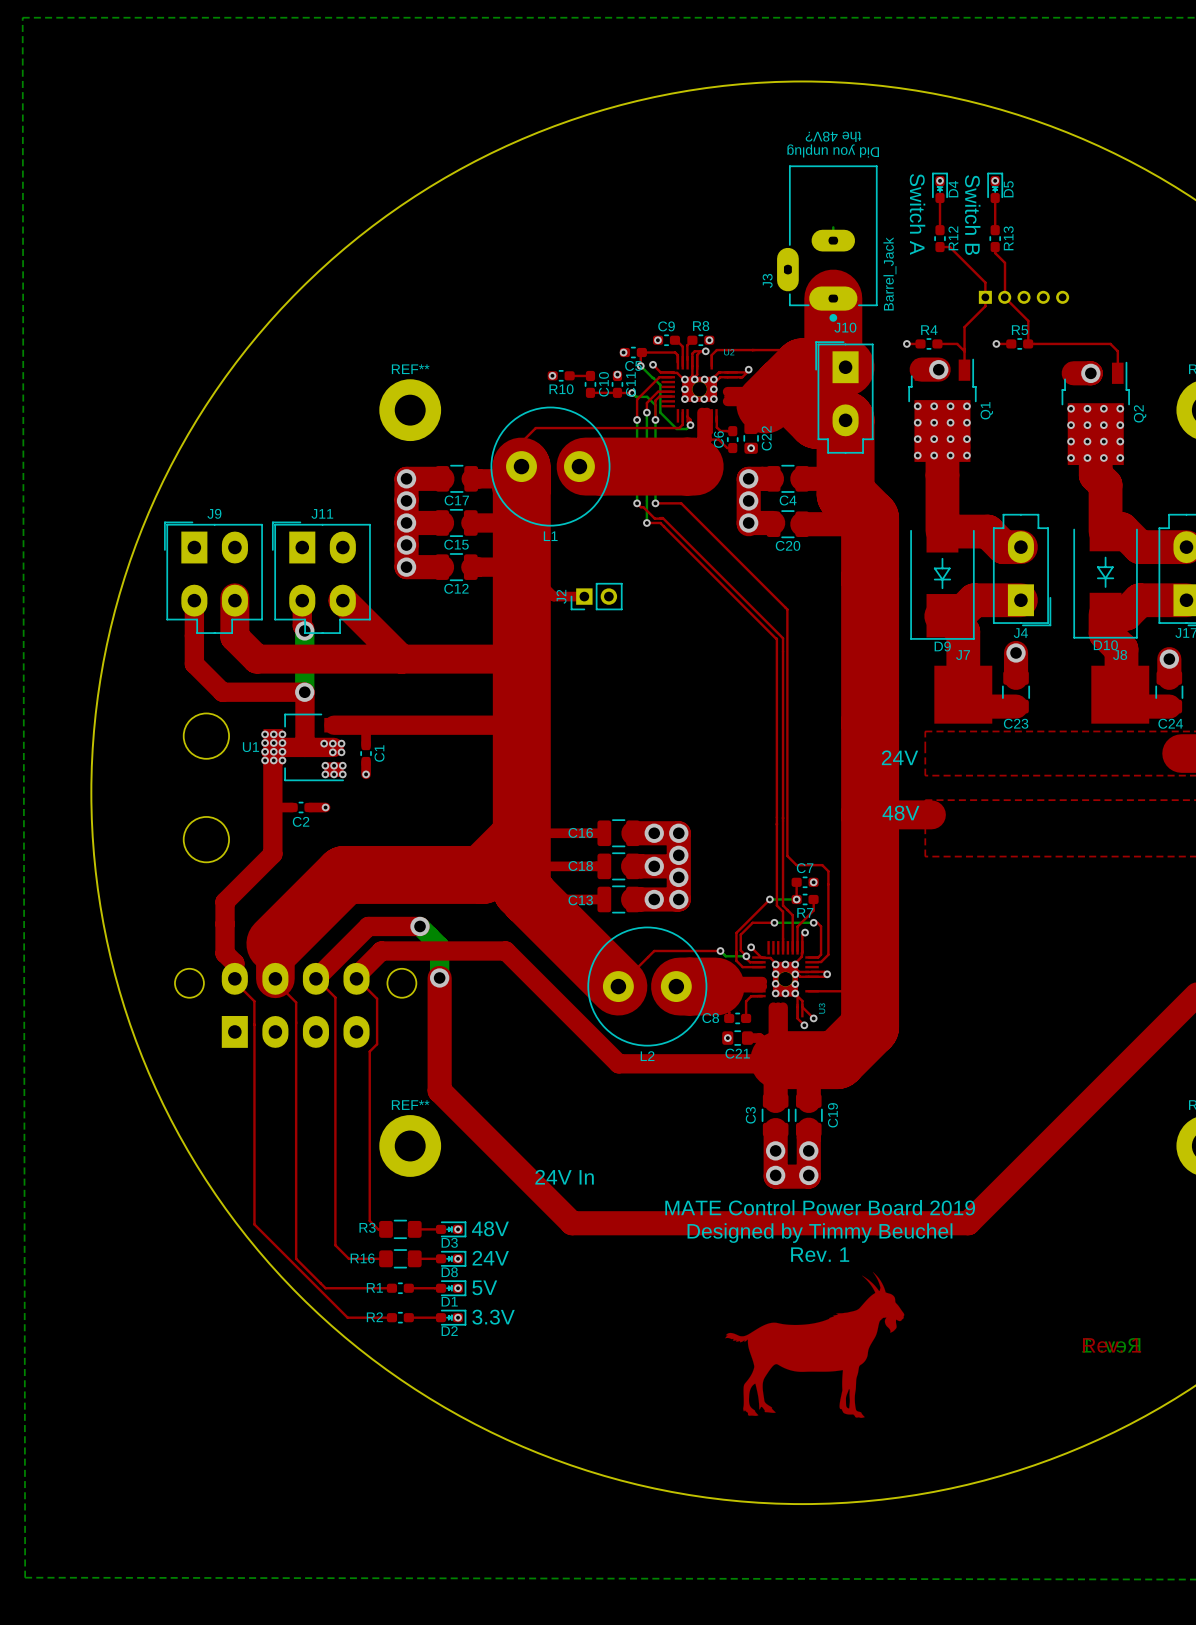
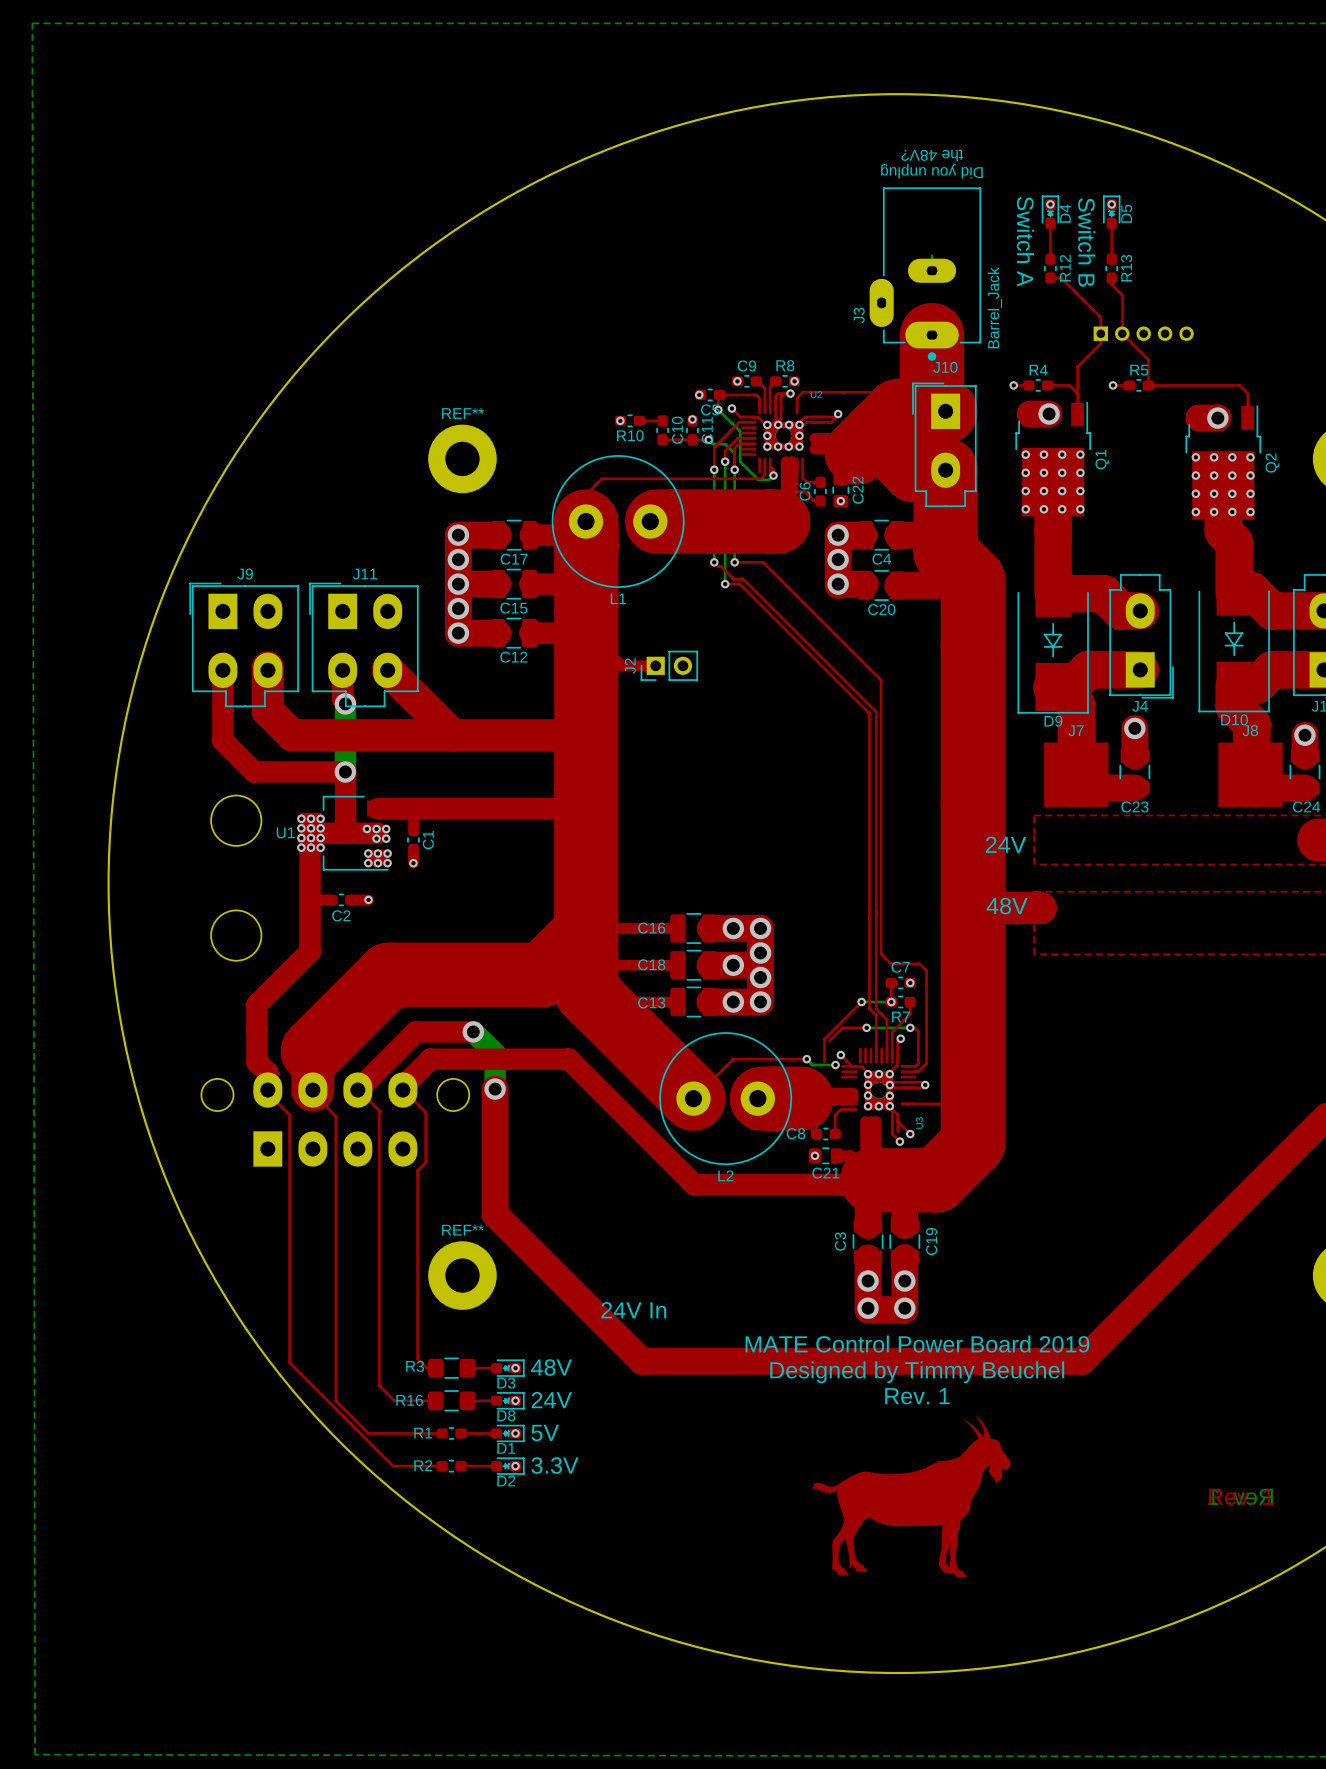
top track: (740, 934) (740, 950) (746, 958) (750, 962) (762, 962) -> none
top track: (736, 953) (736, 960) (742, 967) (762, 967) -> none

